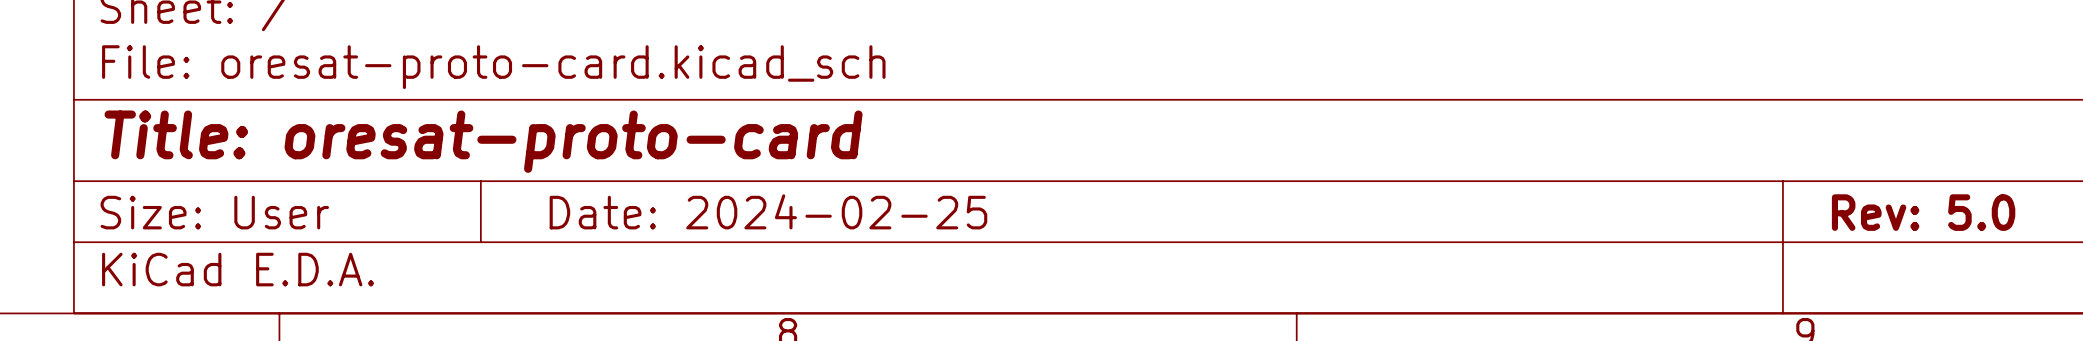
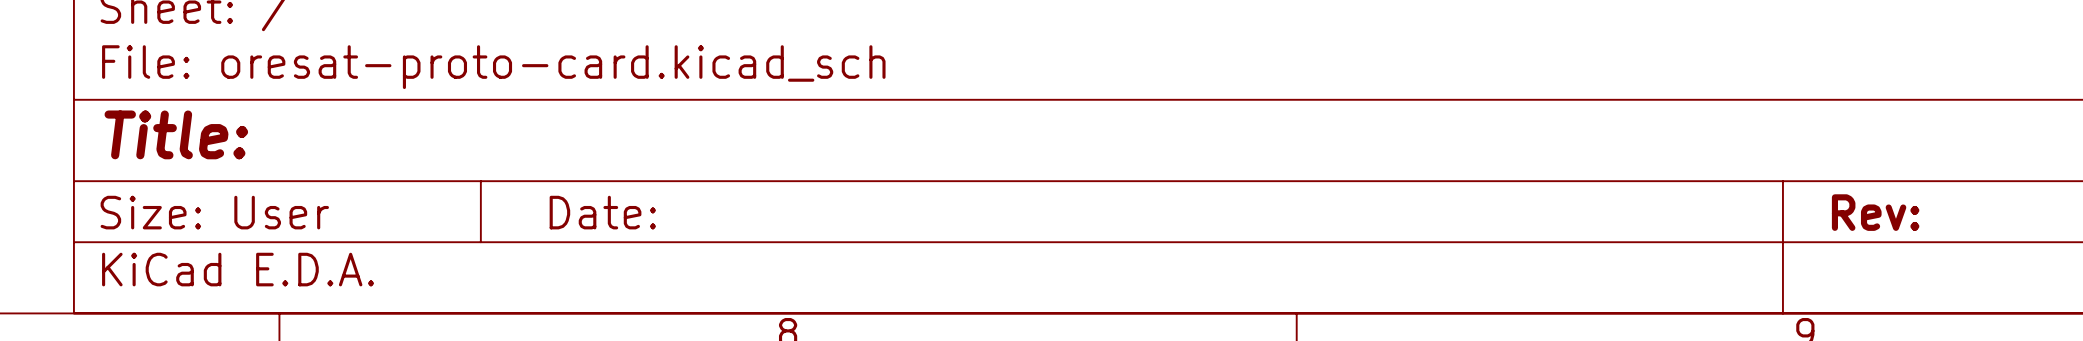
title block: Title: oresat-proto-card (483, 141) -> Title: (176, 134)
title block: Date: 2024-02-25 (768, 211) -> Date: (602, 212)
title block: Rev: 5.0 (1923, 212) -> Rev: (1875, 212)

